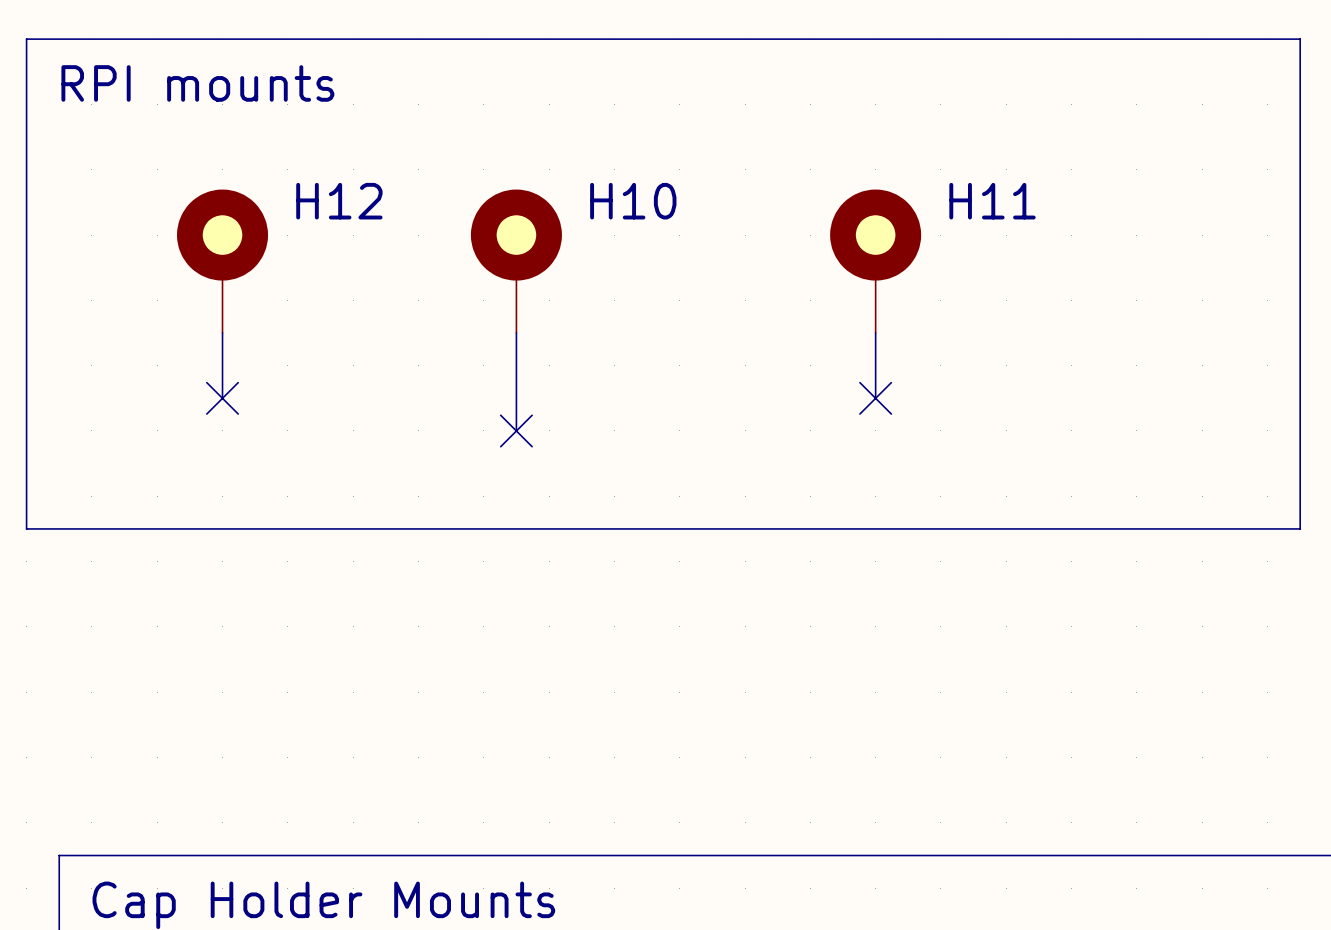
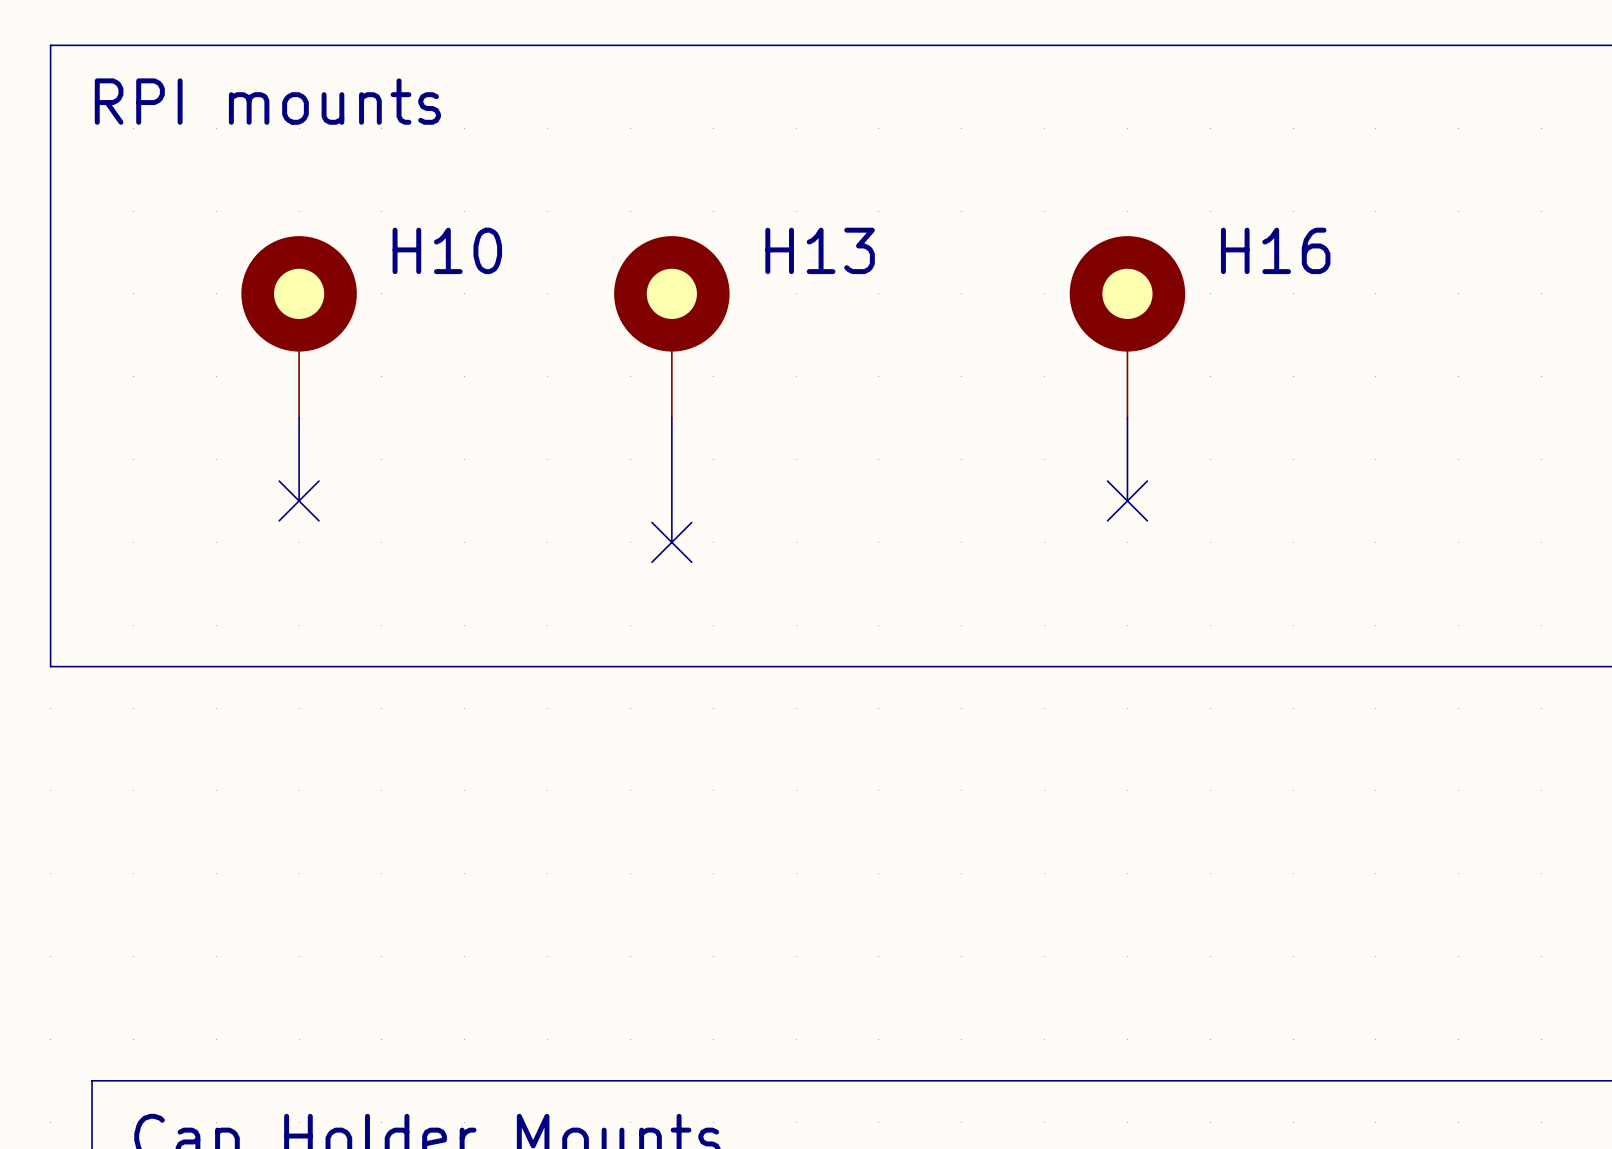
H12 name: H12 (339, 201) -> H10 (447, 250)
H10 name: H10 (633, 201) -> H13 (820, 250)
H11 name: H11 (992, 201) -> H16 (1275, 250)

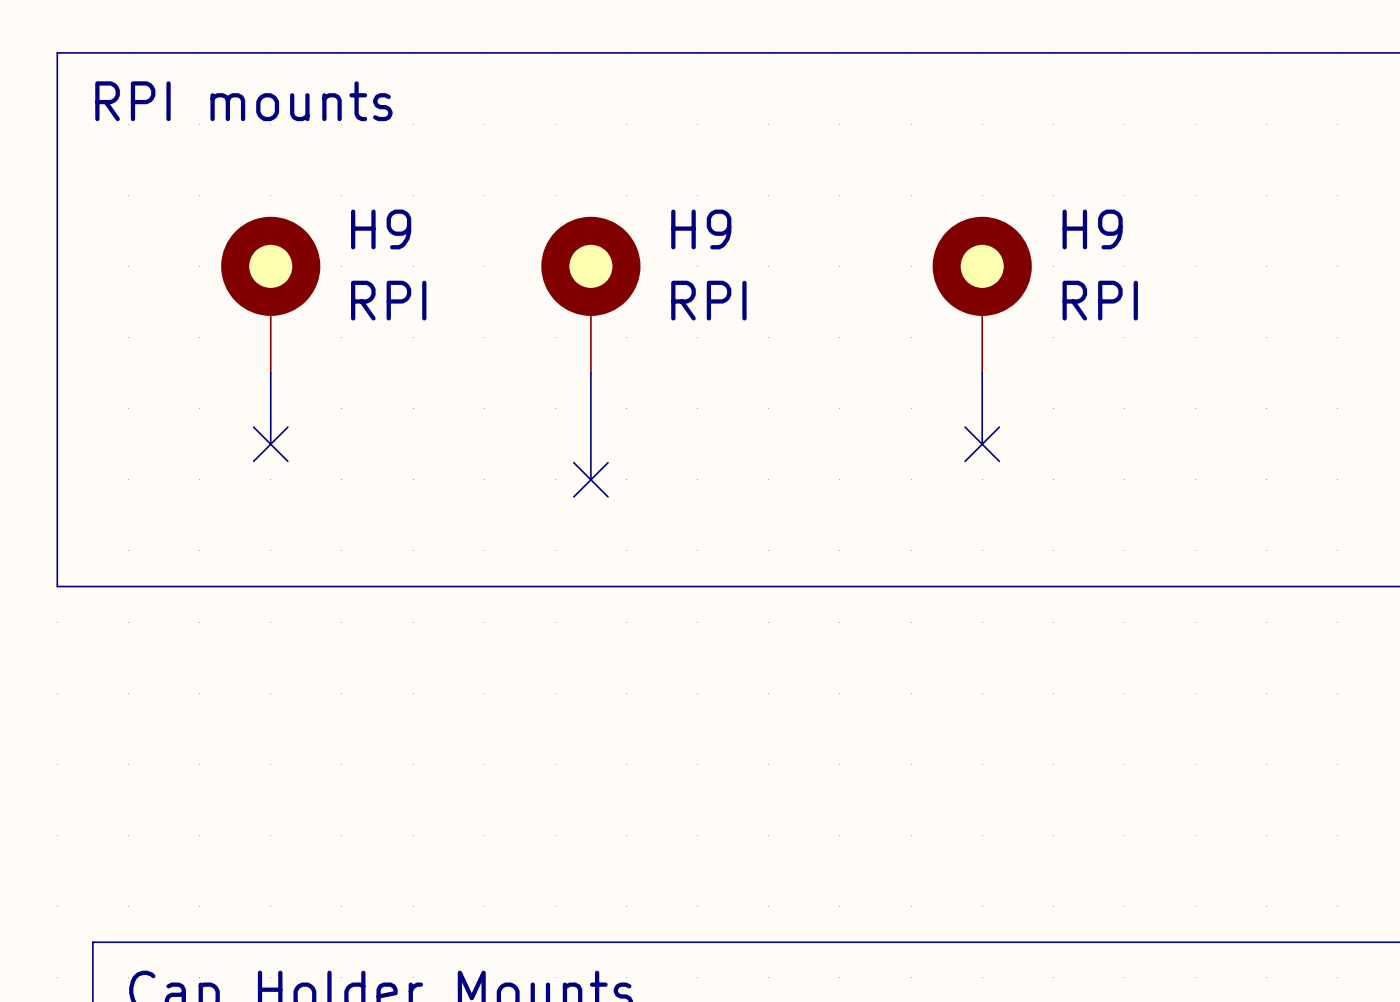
H10 name: H10 (447, 250) -> H9 (381, 229)
H13 name: H13 (820, 250) -> H9 (701, 229)
H16 name: H16 (1275, 250) -> H9 (1092, 229)
H10 value: none -> RPI (388, 300)
H13 value: none -> RPI (708, 300)
H16 value: none -> RPI (1100, 300)

